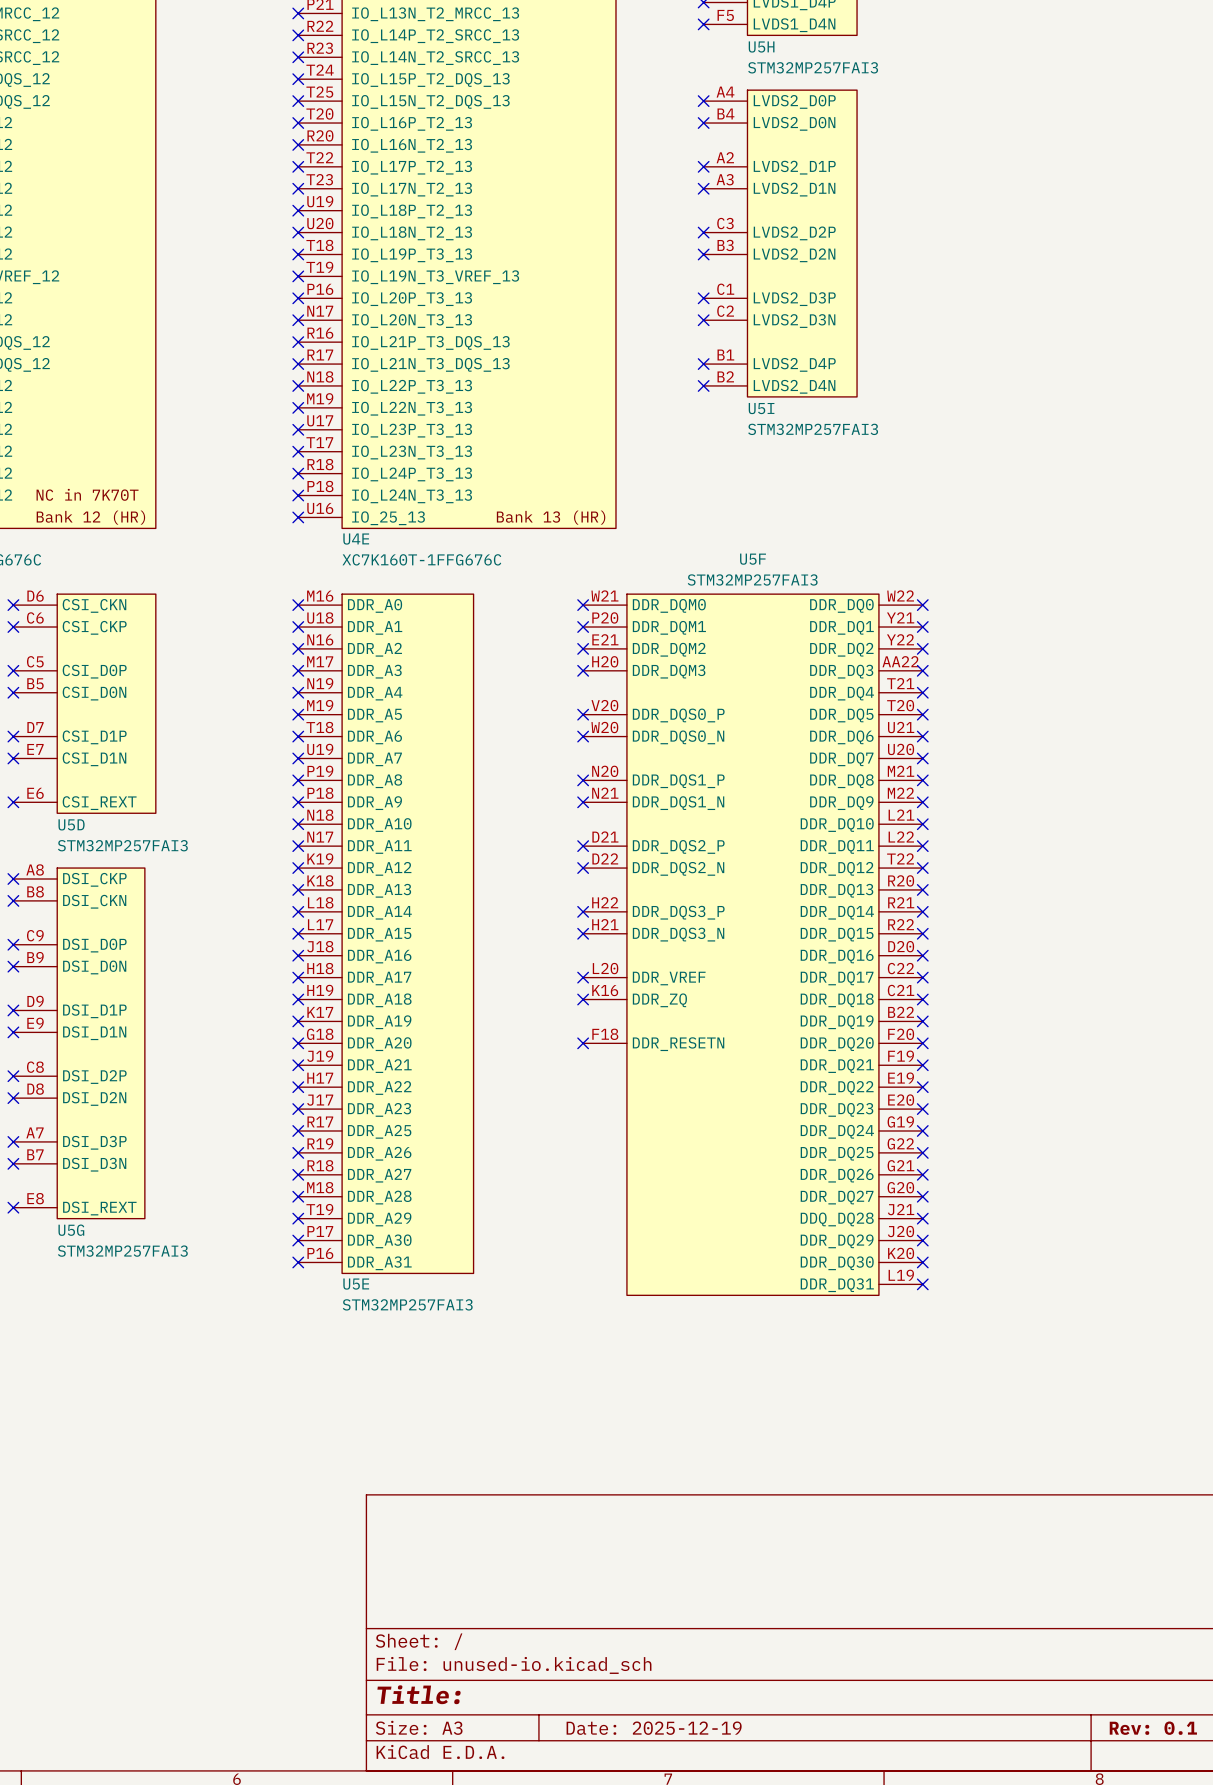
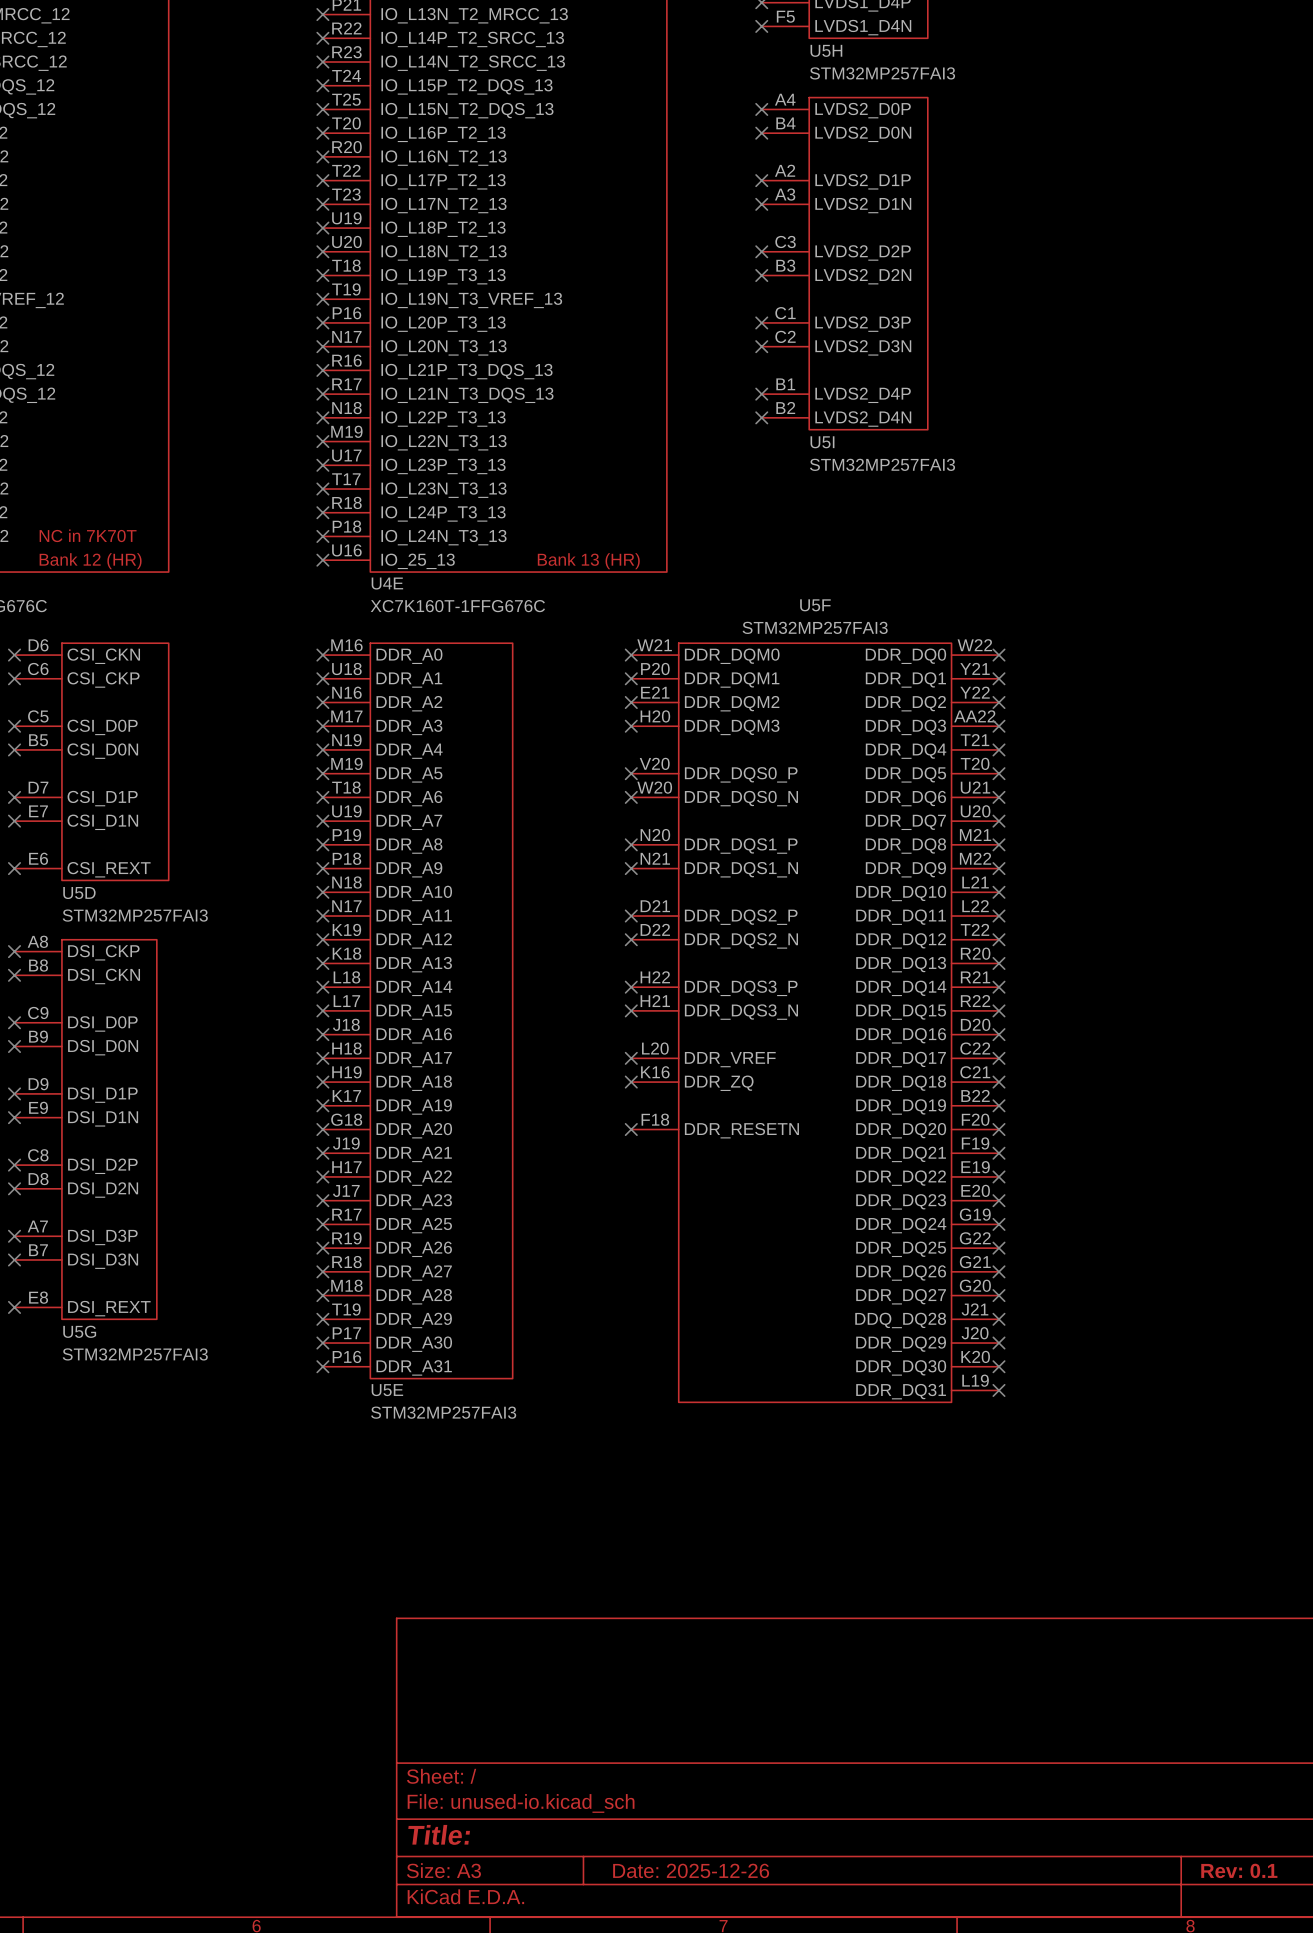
title block: Date: 2025-12-19 (654, 1728) -> Date: 2025-12-26 (691, 1870)

